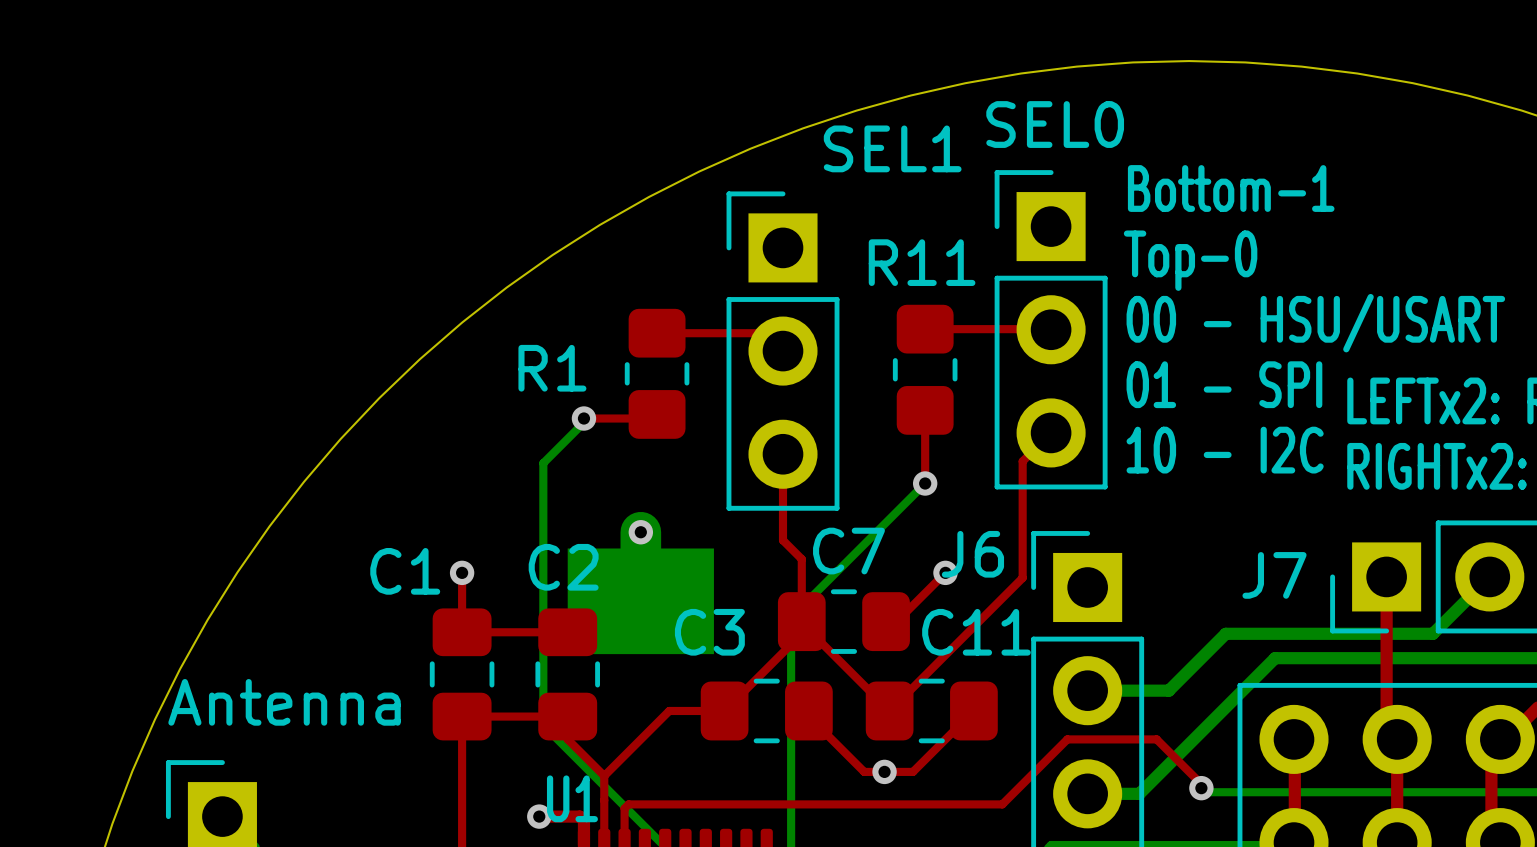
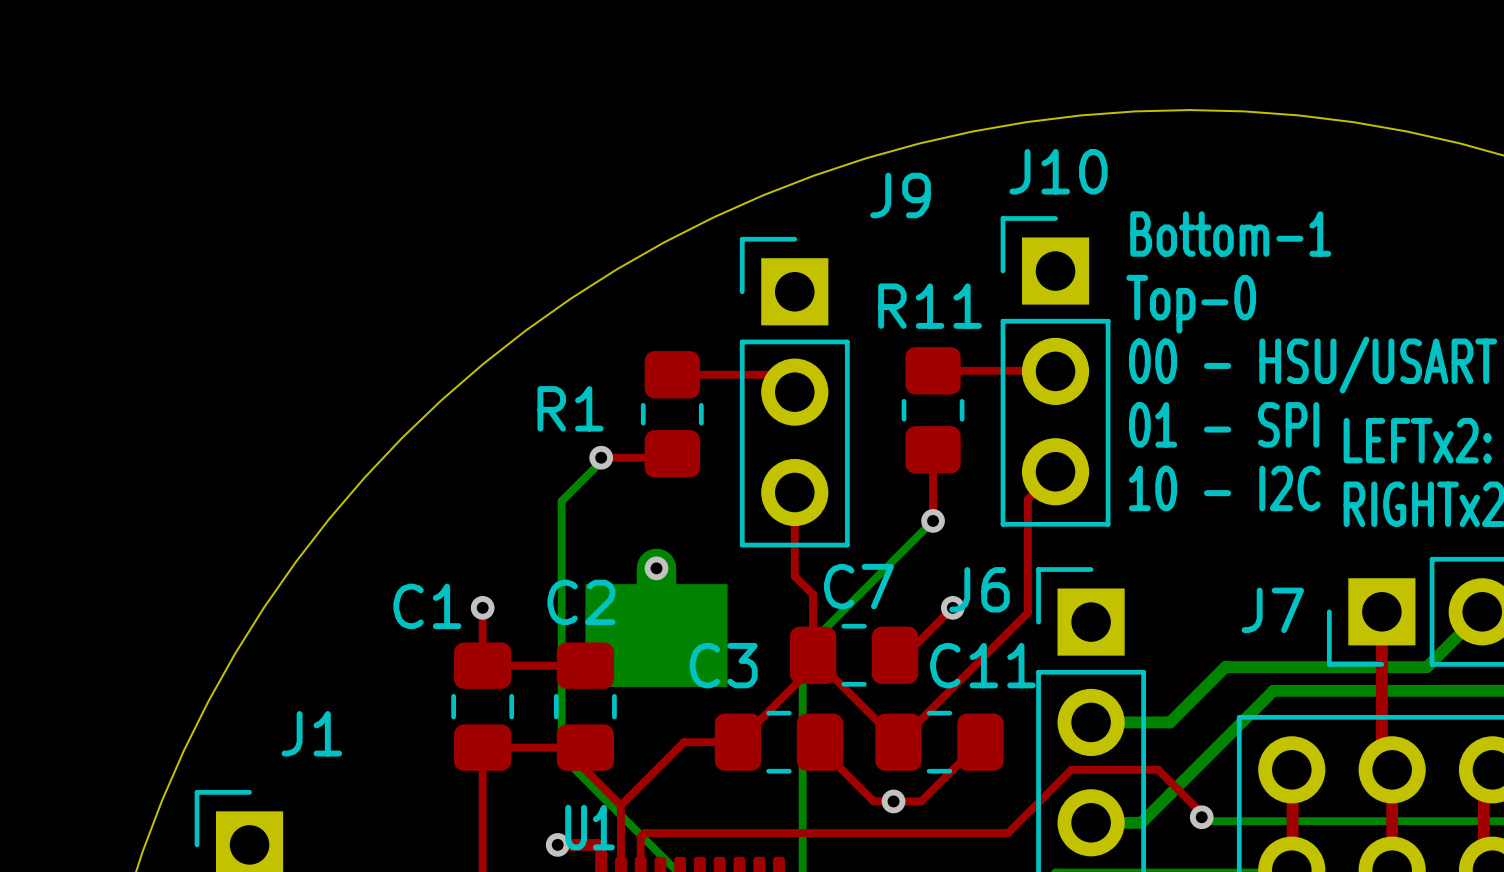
SEL0 name: SEL0 (1055, 124) -> J10 (1058, 171)
SEL1 name: SEL1 (892, 148) -> J9 (900, 195)
Antenna name: Antenna (284, 702) -> J1 (311, 733)

